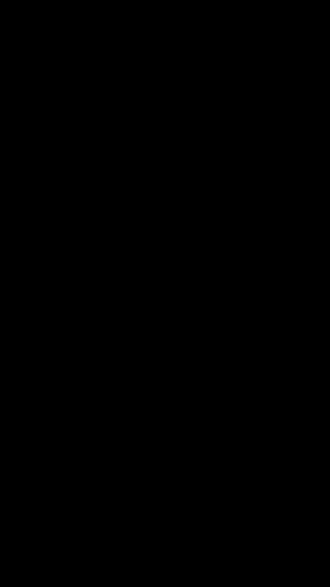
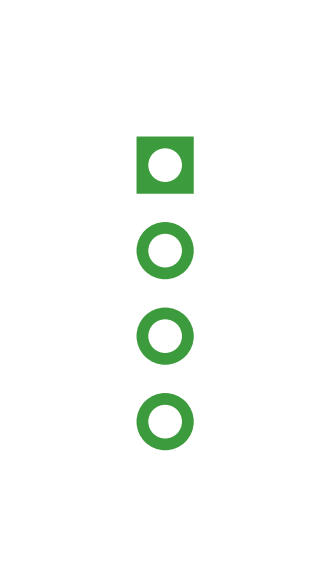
part: none -> (165, 293)

